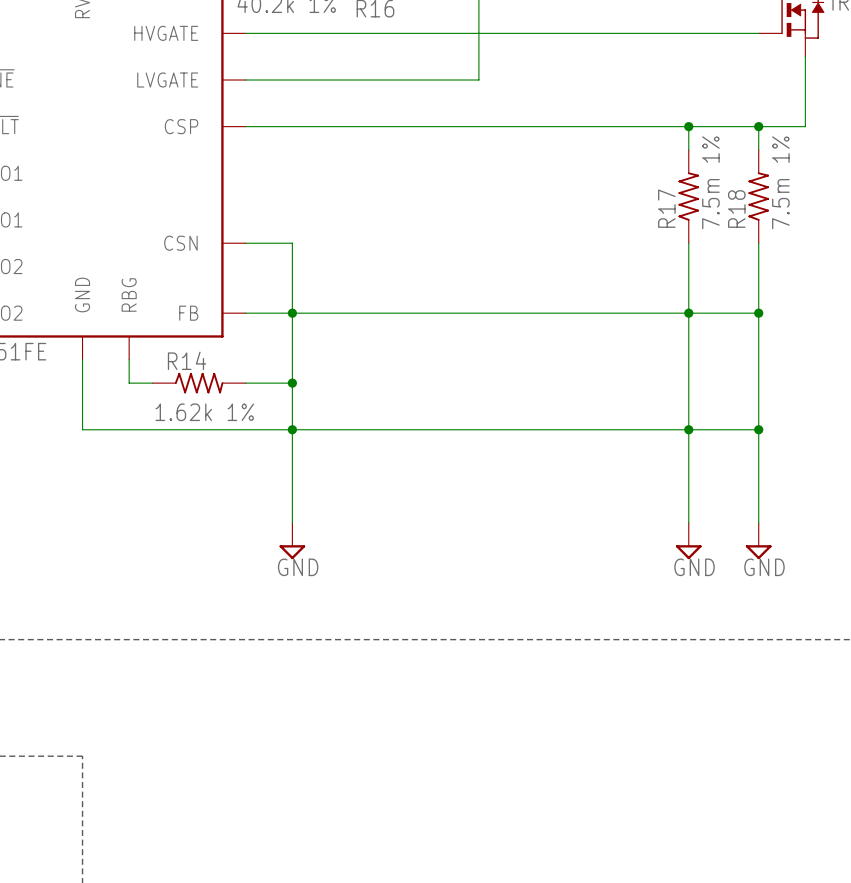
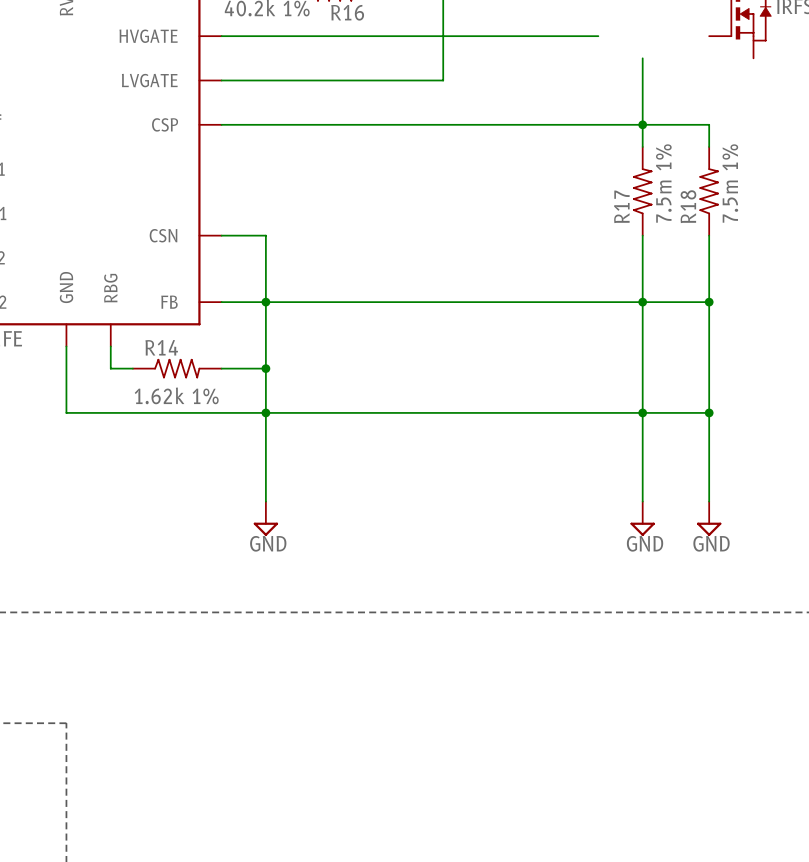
wire: (642, 33) (758, 33) -> none
wire: none -> (642, 58) (642, 124)
wire: (805, 56) (805, 126) (758, 126) -> none
junction: (758, 126) -> none

